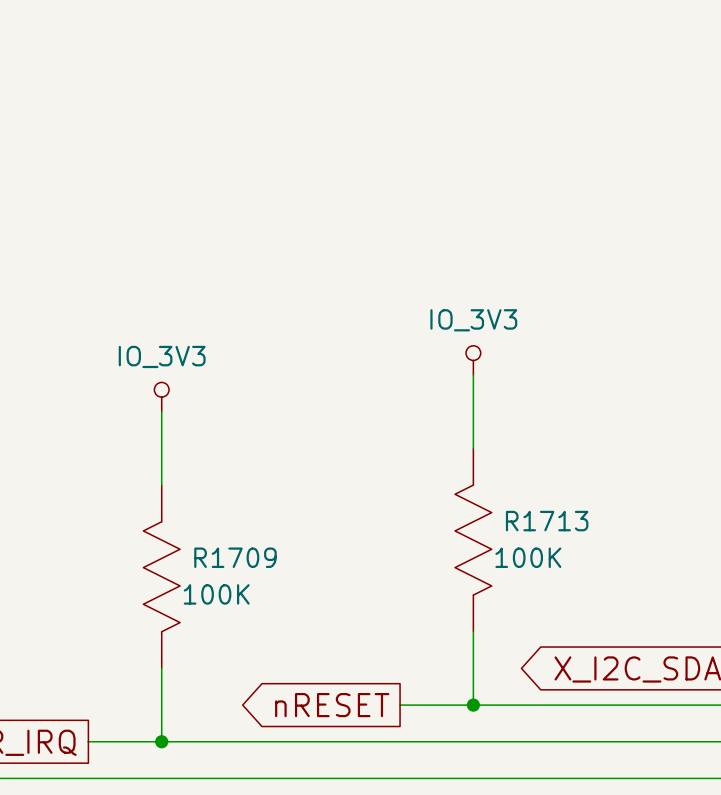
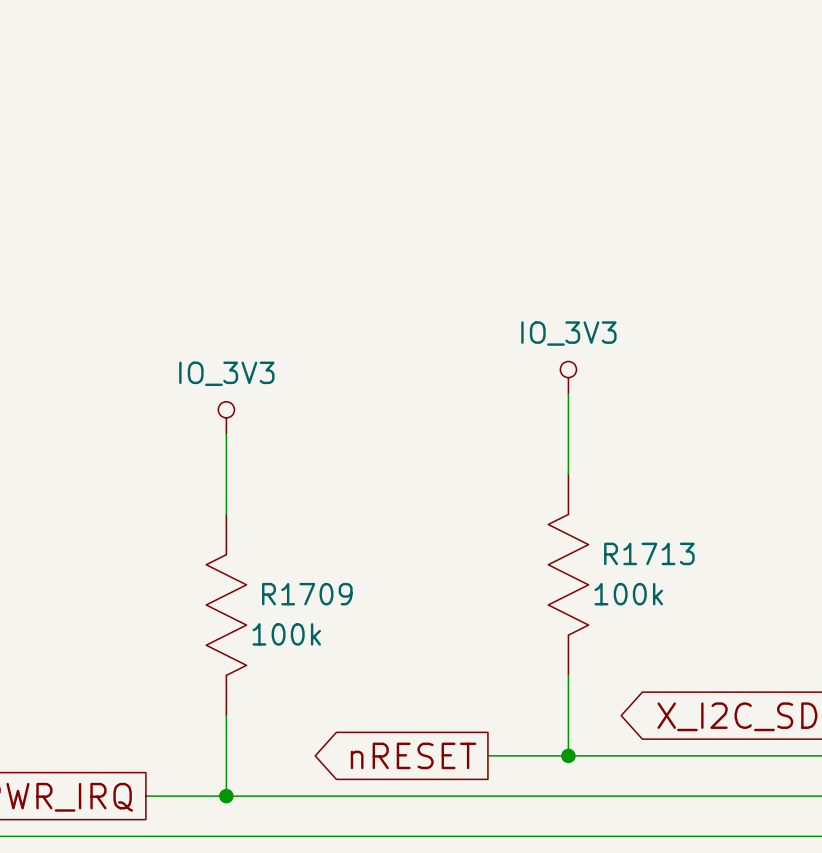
R1713 value: 100K (528, 557) -> 100k (628, 594)
R1709 value: 100K (216, 594) -> 100k (286, 634)

